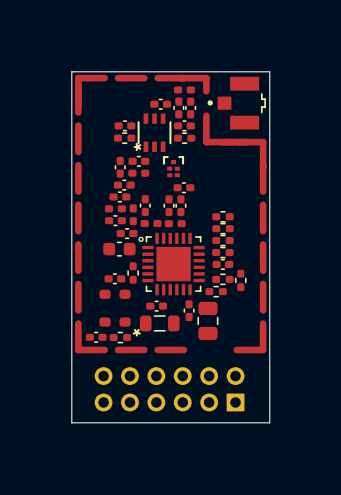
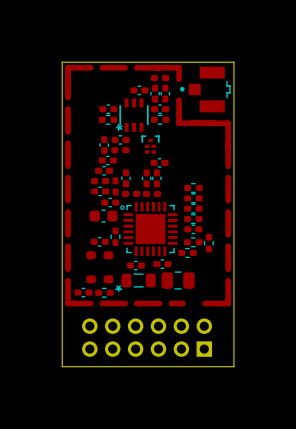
part footprint: [75, 74, 267, 354] -> [65, 64, 232, 307]
part rotation: 0° (189, 310) -> 90° clockwise (162, 264)
part rotation: 0° (207, 320) -> 90° clockwise (178, 280)

